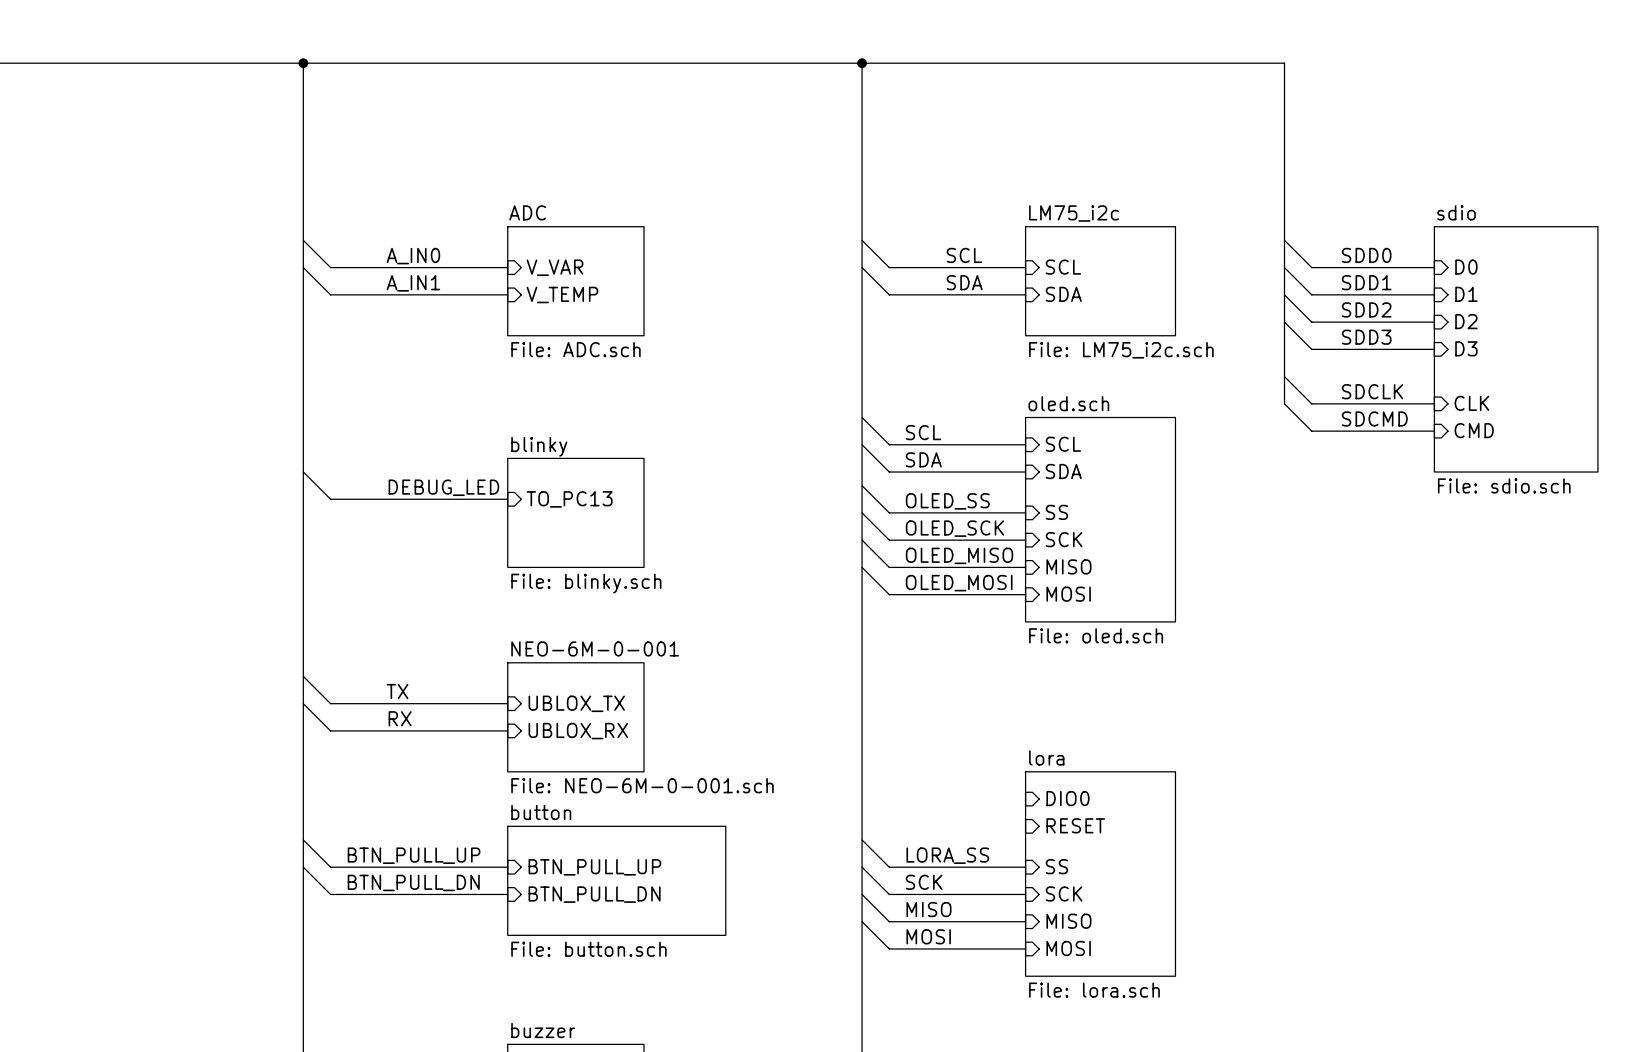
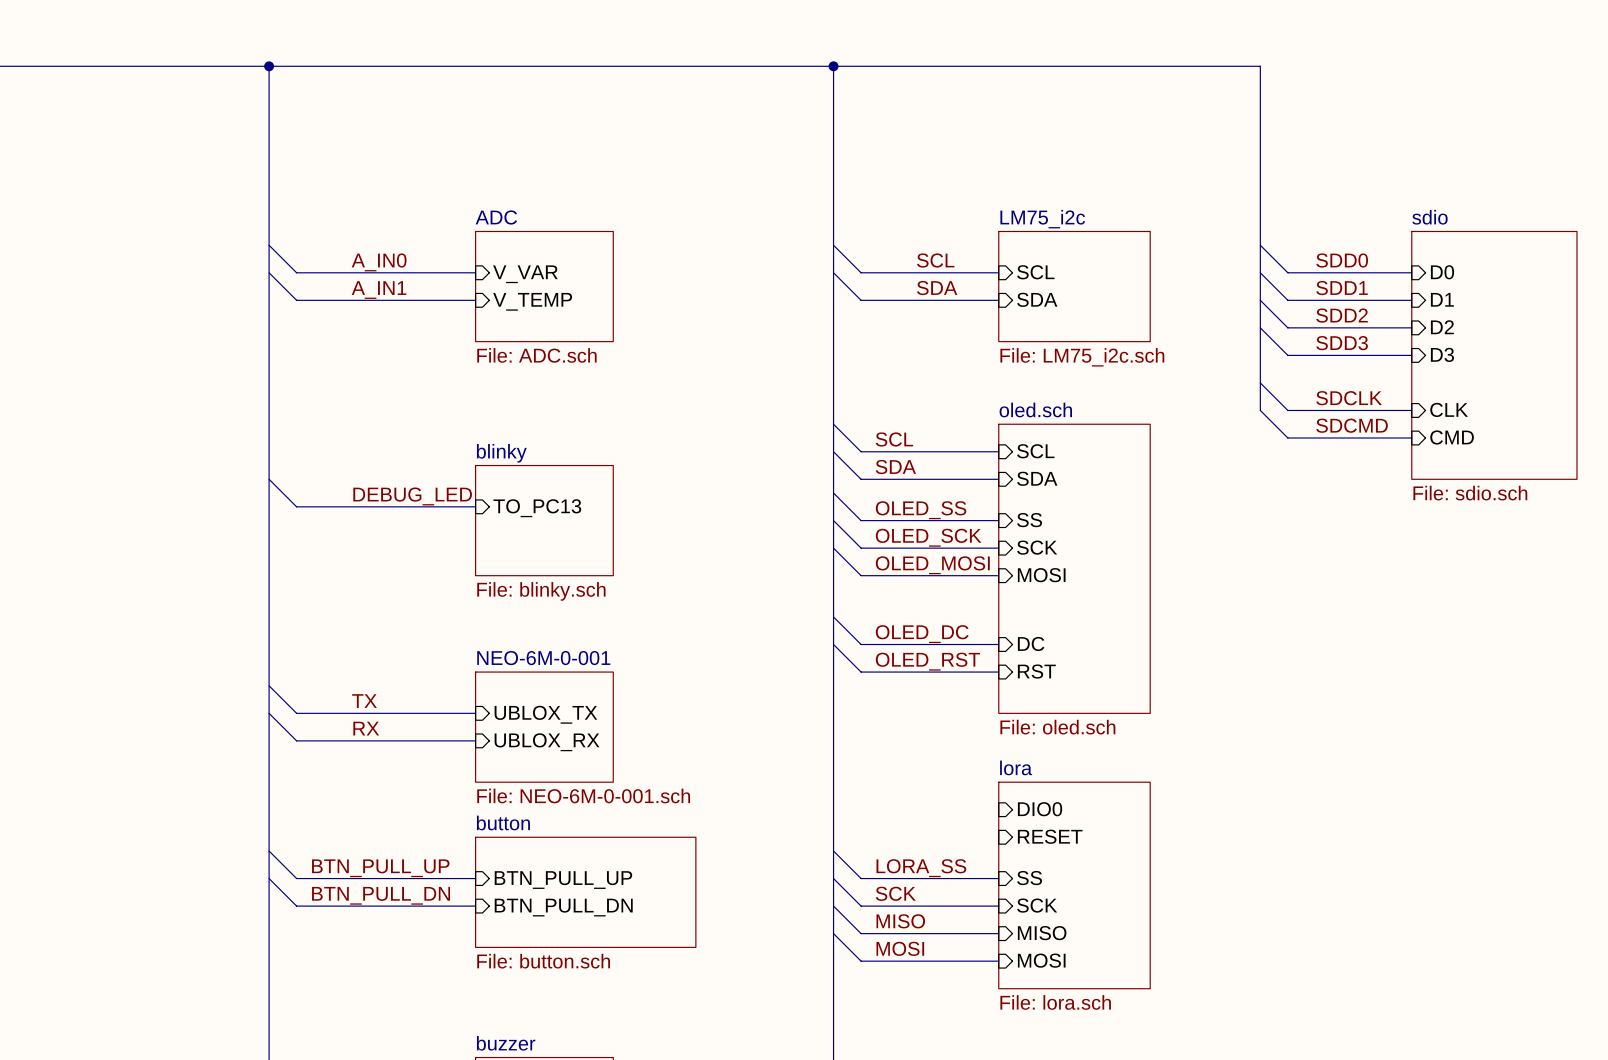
sheet oled.sch: File: oled.sch (1100, 519) -> none
label: OLED_MISO (959, 555) -> OLED_MOSI (932, 565)
sheet oled.sch: none -> File: oled.sch (1074, 568)
sheet pin: MISO (1068, 566) -> MOSI (1041, 575)
wire: (862, 567) (889, 594) (1025, 594) -> (833, 616) (861, 644) (998, 644)
label: OLED_MOSI (959, 583) -> none
sheet pin: MOSI (1068, 594) -> none
label: none -> OLED_DC (922, 634)
wire: none -> (833, 644) (861, 672) (998, 672)
sheet pin: none -> DC (1031, 643)
label: none -> OLED_RST (927, 661)
sheet pin: none -> RST (1036, 671)

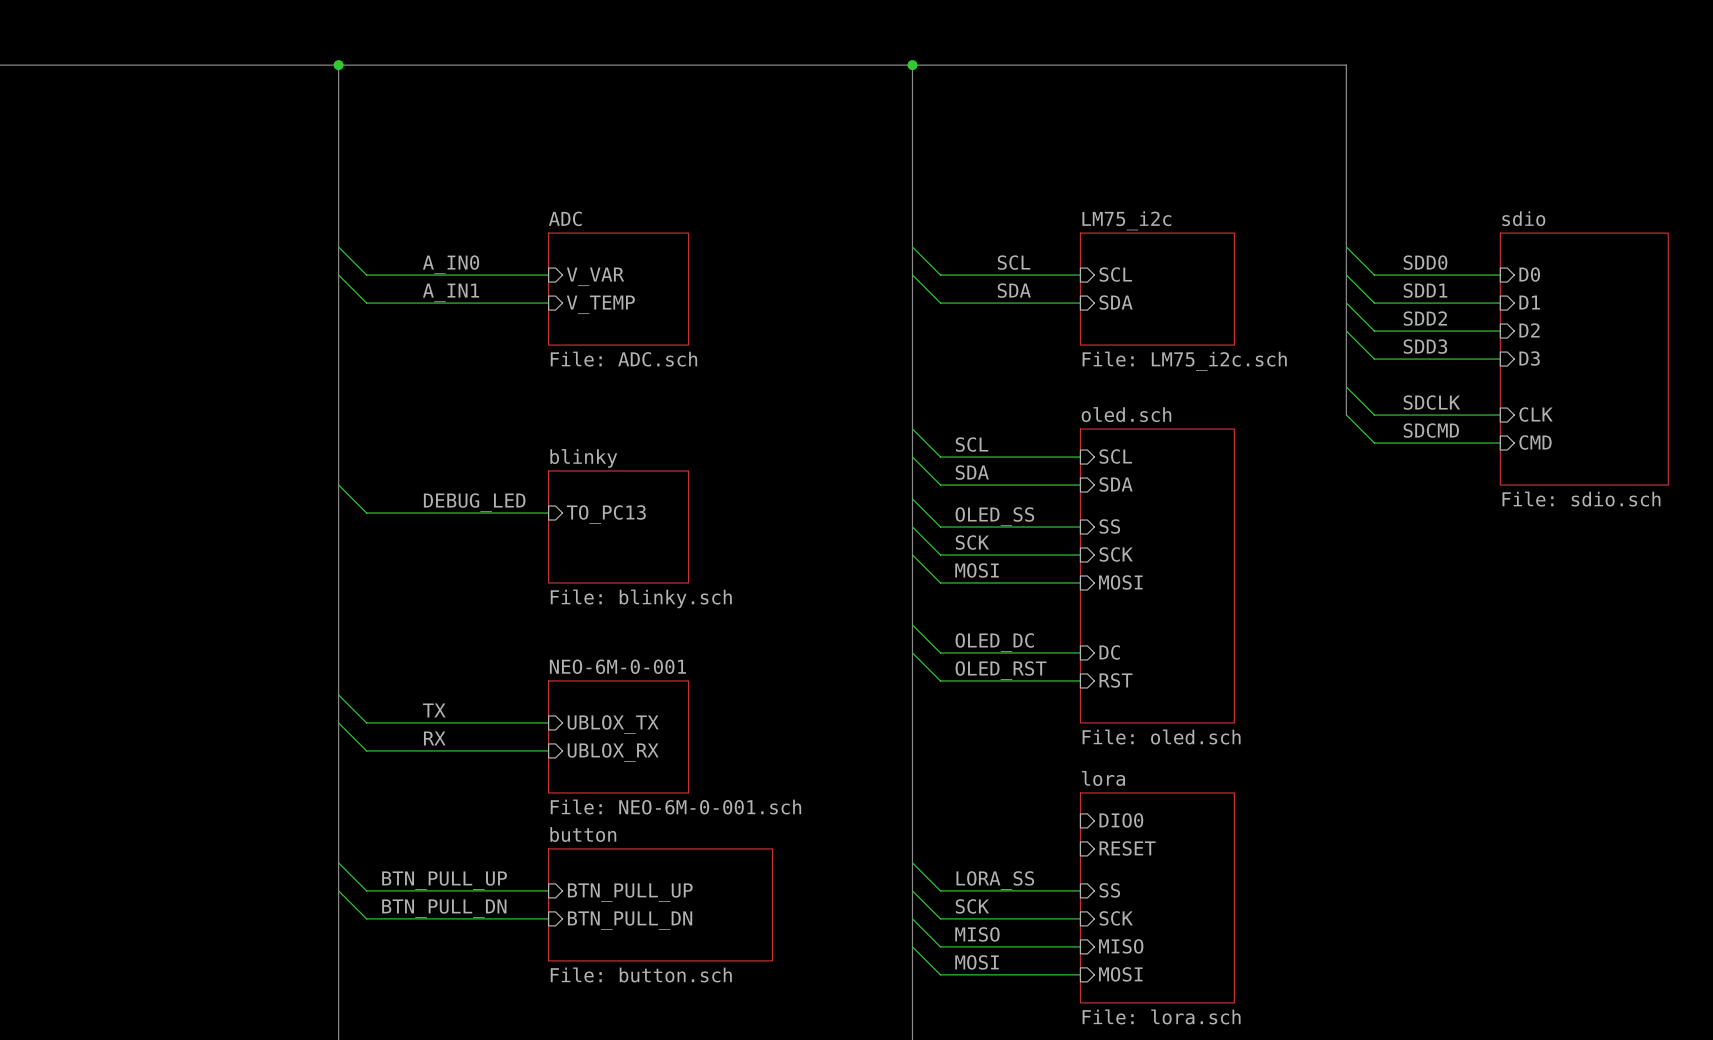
label: OLED_SCK (928, 537) -> SCK (972, 542)
label: OLED_MOSI (932, 565) -> MOSI (977, 570)

